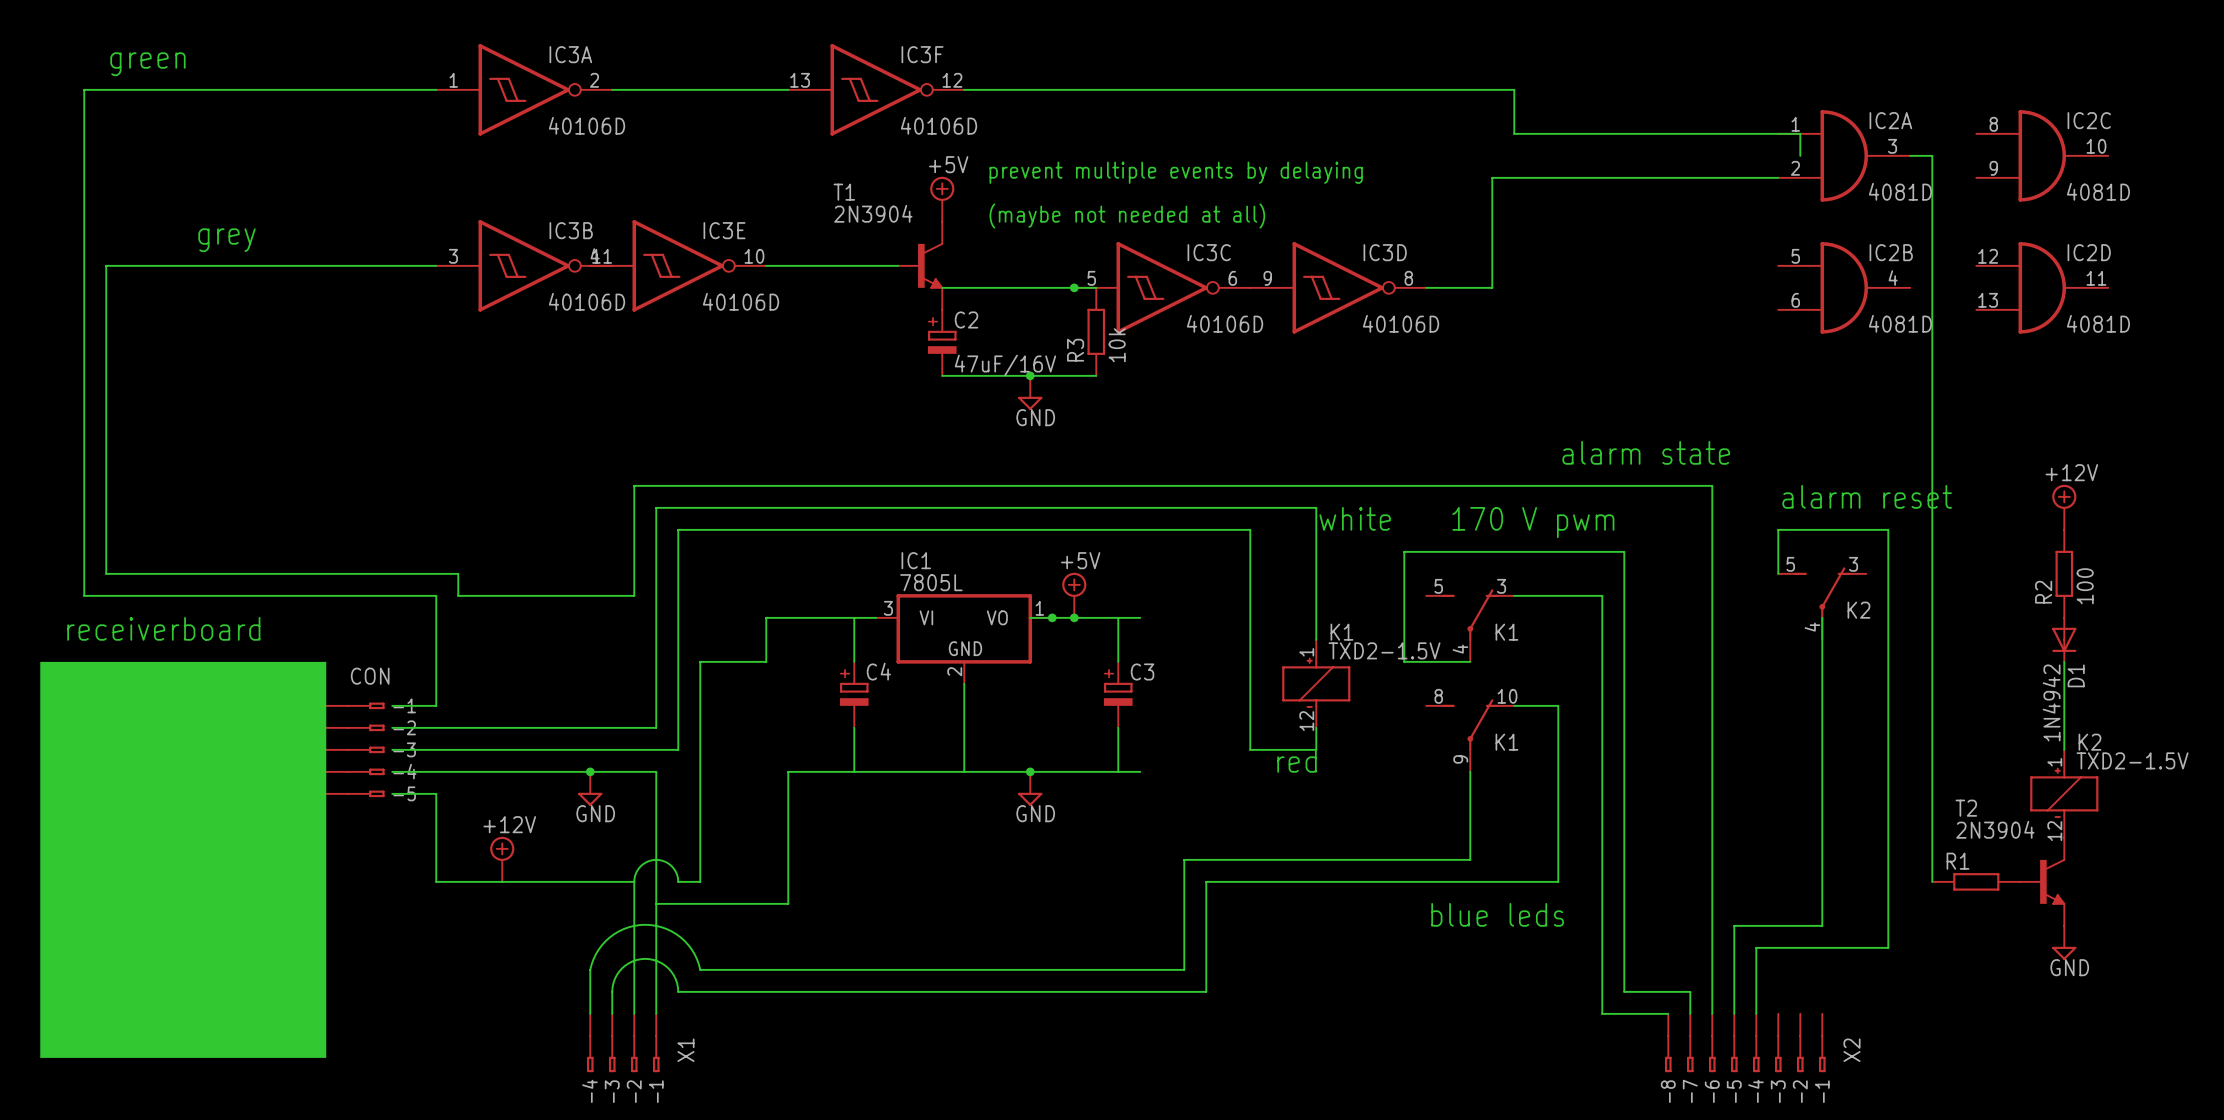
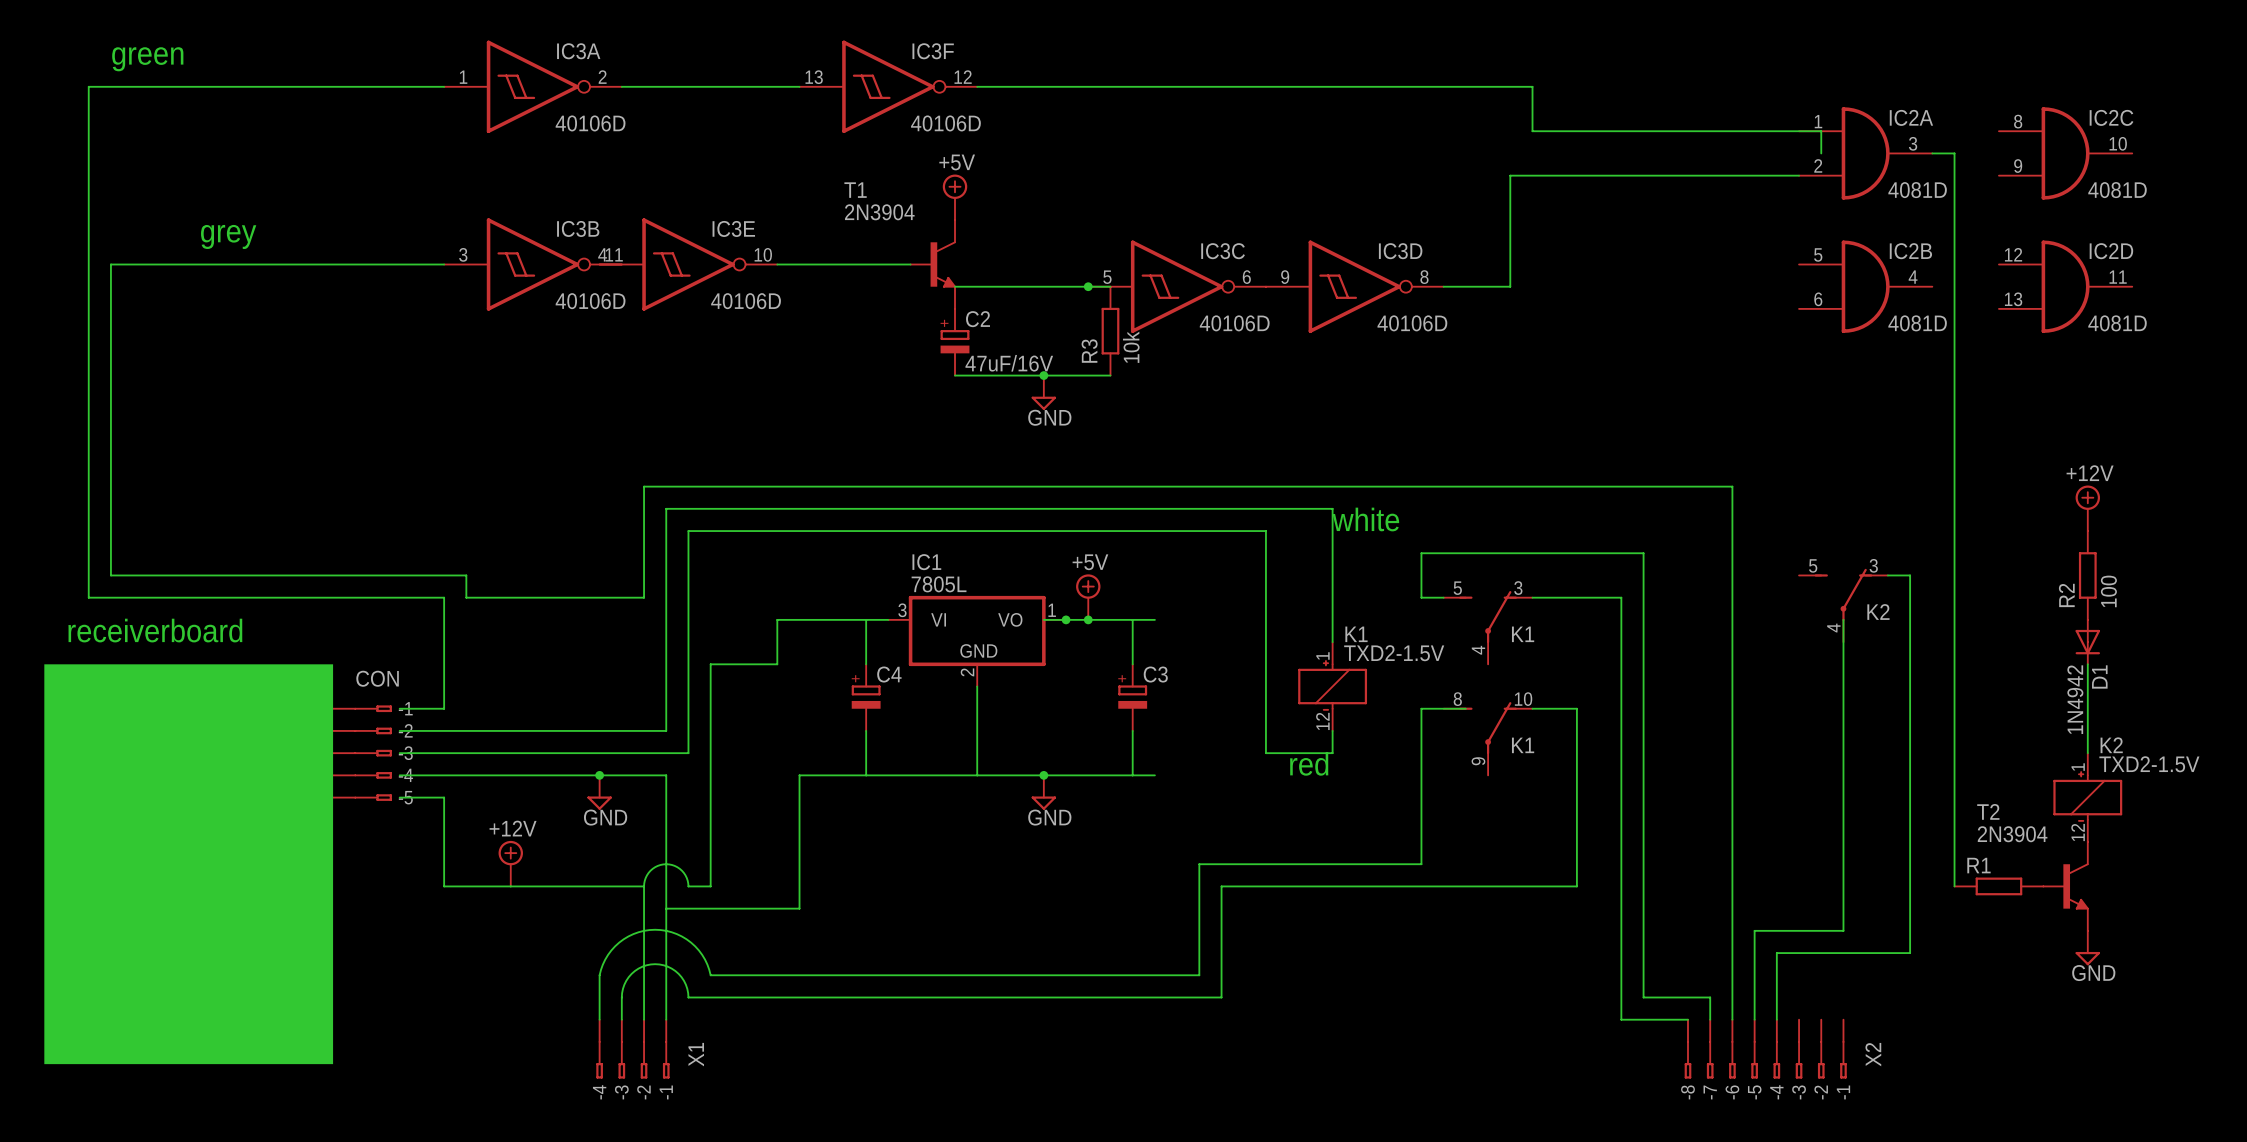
text: prevent multiple events by delaying (1176, 172) -> none
text: (maybe not needed at all) (1127, 215) -> none
text: alarm state (1646, 452) -> none
text: alarm reset (1867, 496) -> none
text: 170 V pwm (1533, 522) -> none
wire: (1778, 573) (1778, 529) (1888, 529) (1888, 573) -> (1887, 575) (1910, 575)
wire: (1404, 595) (1404, 661) (1470, 661) -> (1421, 597) (1443, 597)
wire: (1470, 771) (1470, 859) (1404, 859) -> (1465, 708) (1421, 708) (1421, 864)
text: blue leds (1497, 914) -> none

